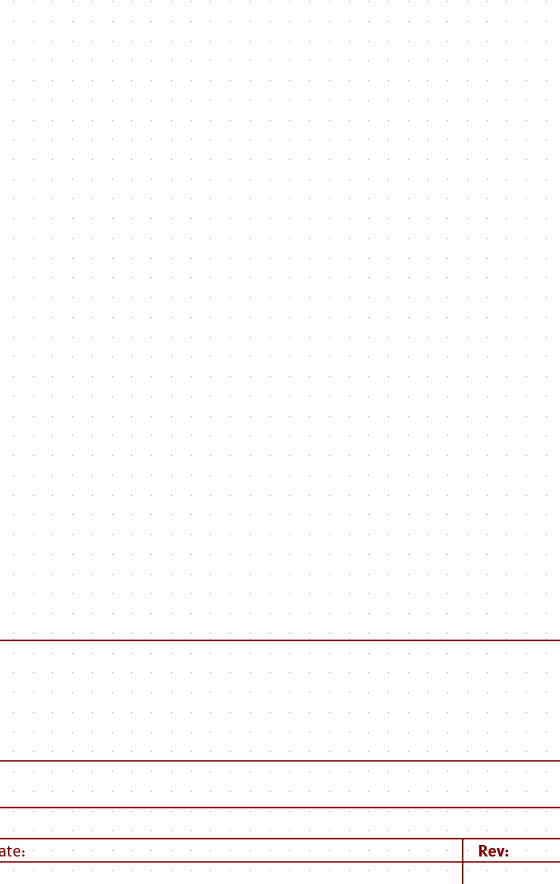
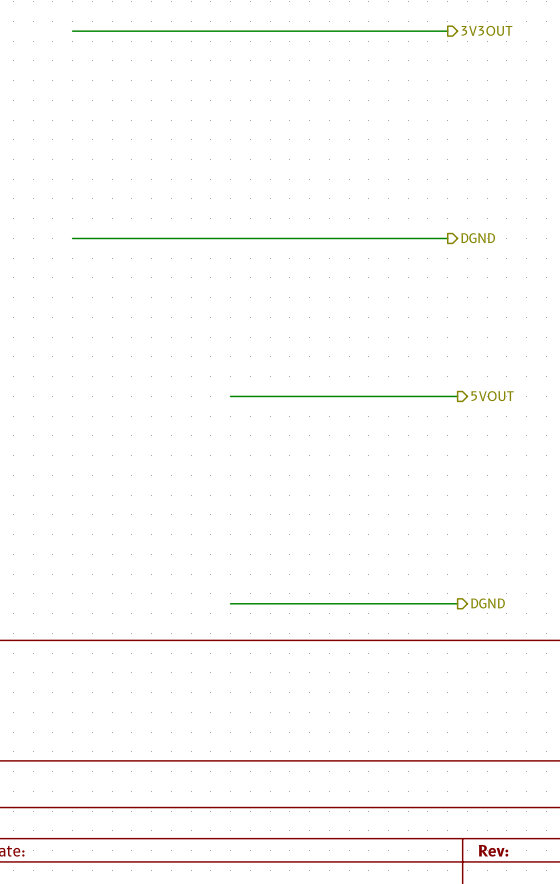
hierarchical label: none -> 3V3OUT (486, 30)
wire: none -> (72, 31) (447, 31)
wire: none -> (72, 238) (447, 238)
hierarchical label: none -> DGND (478, 238)
wire: none -> (230, 396) (457, 396)
hierarchical label: none -> 5VOUT (492, 396)
wire: none -> (230, 603) (457, 603)
hierarchical label: none -> DGND (488, 603)

